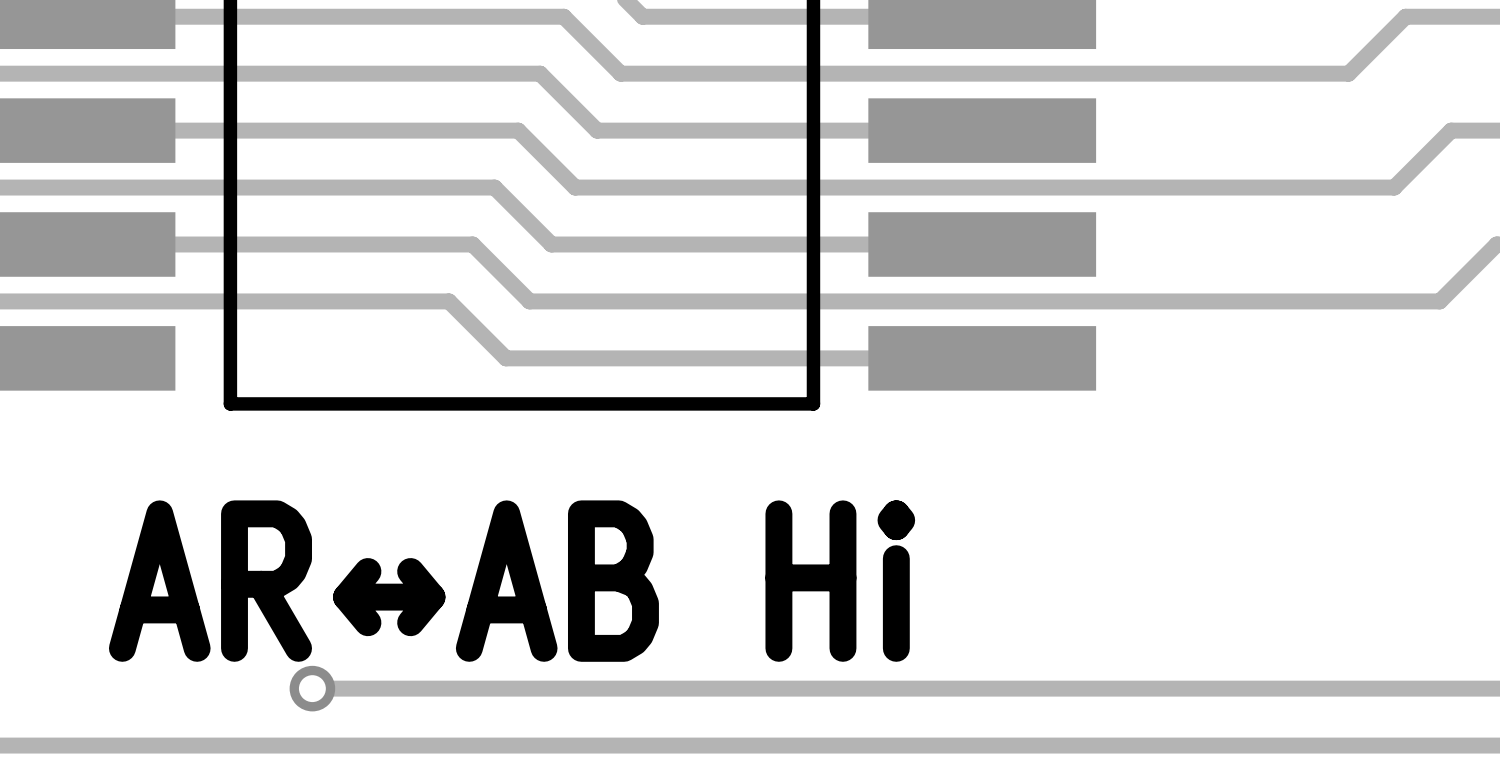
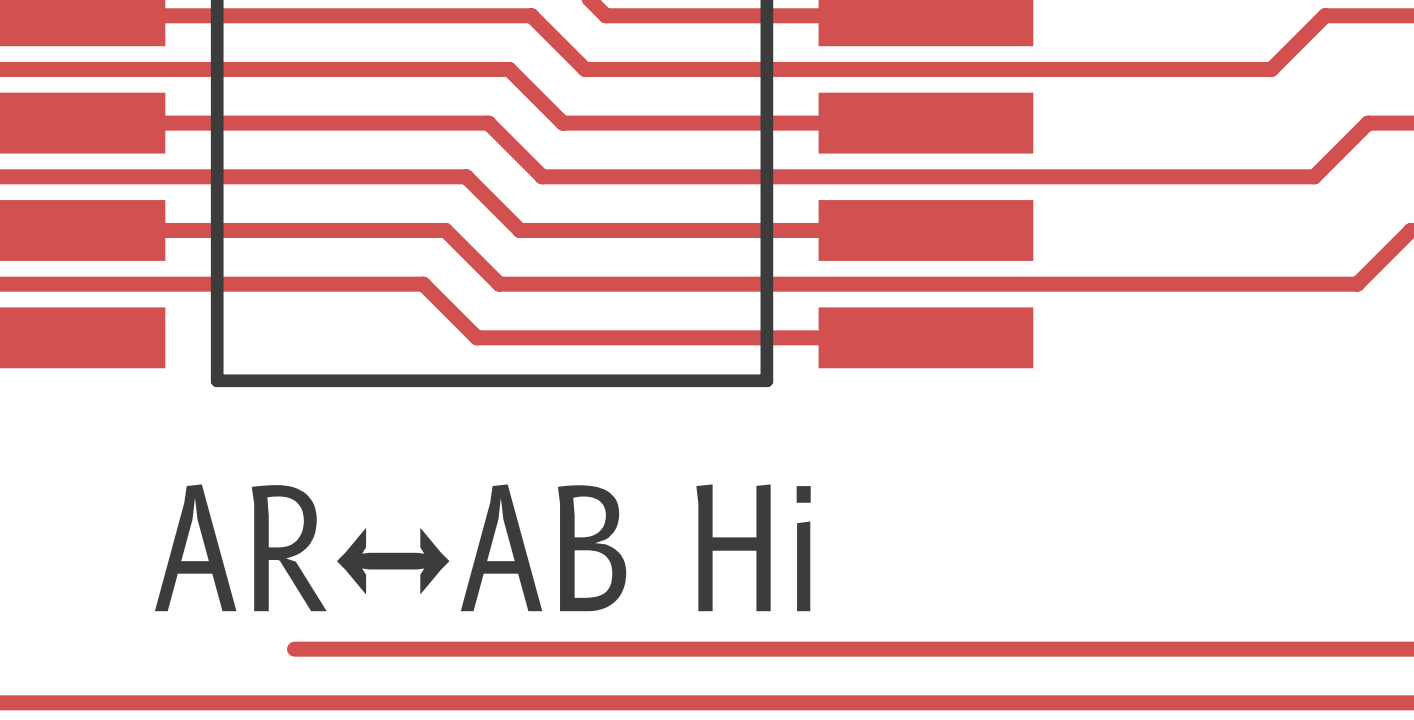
via: (312, 688) -> none

